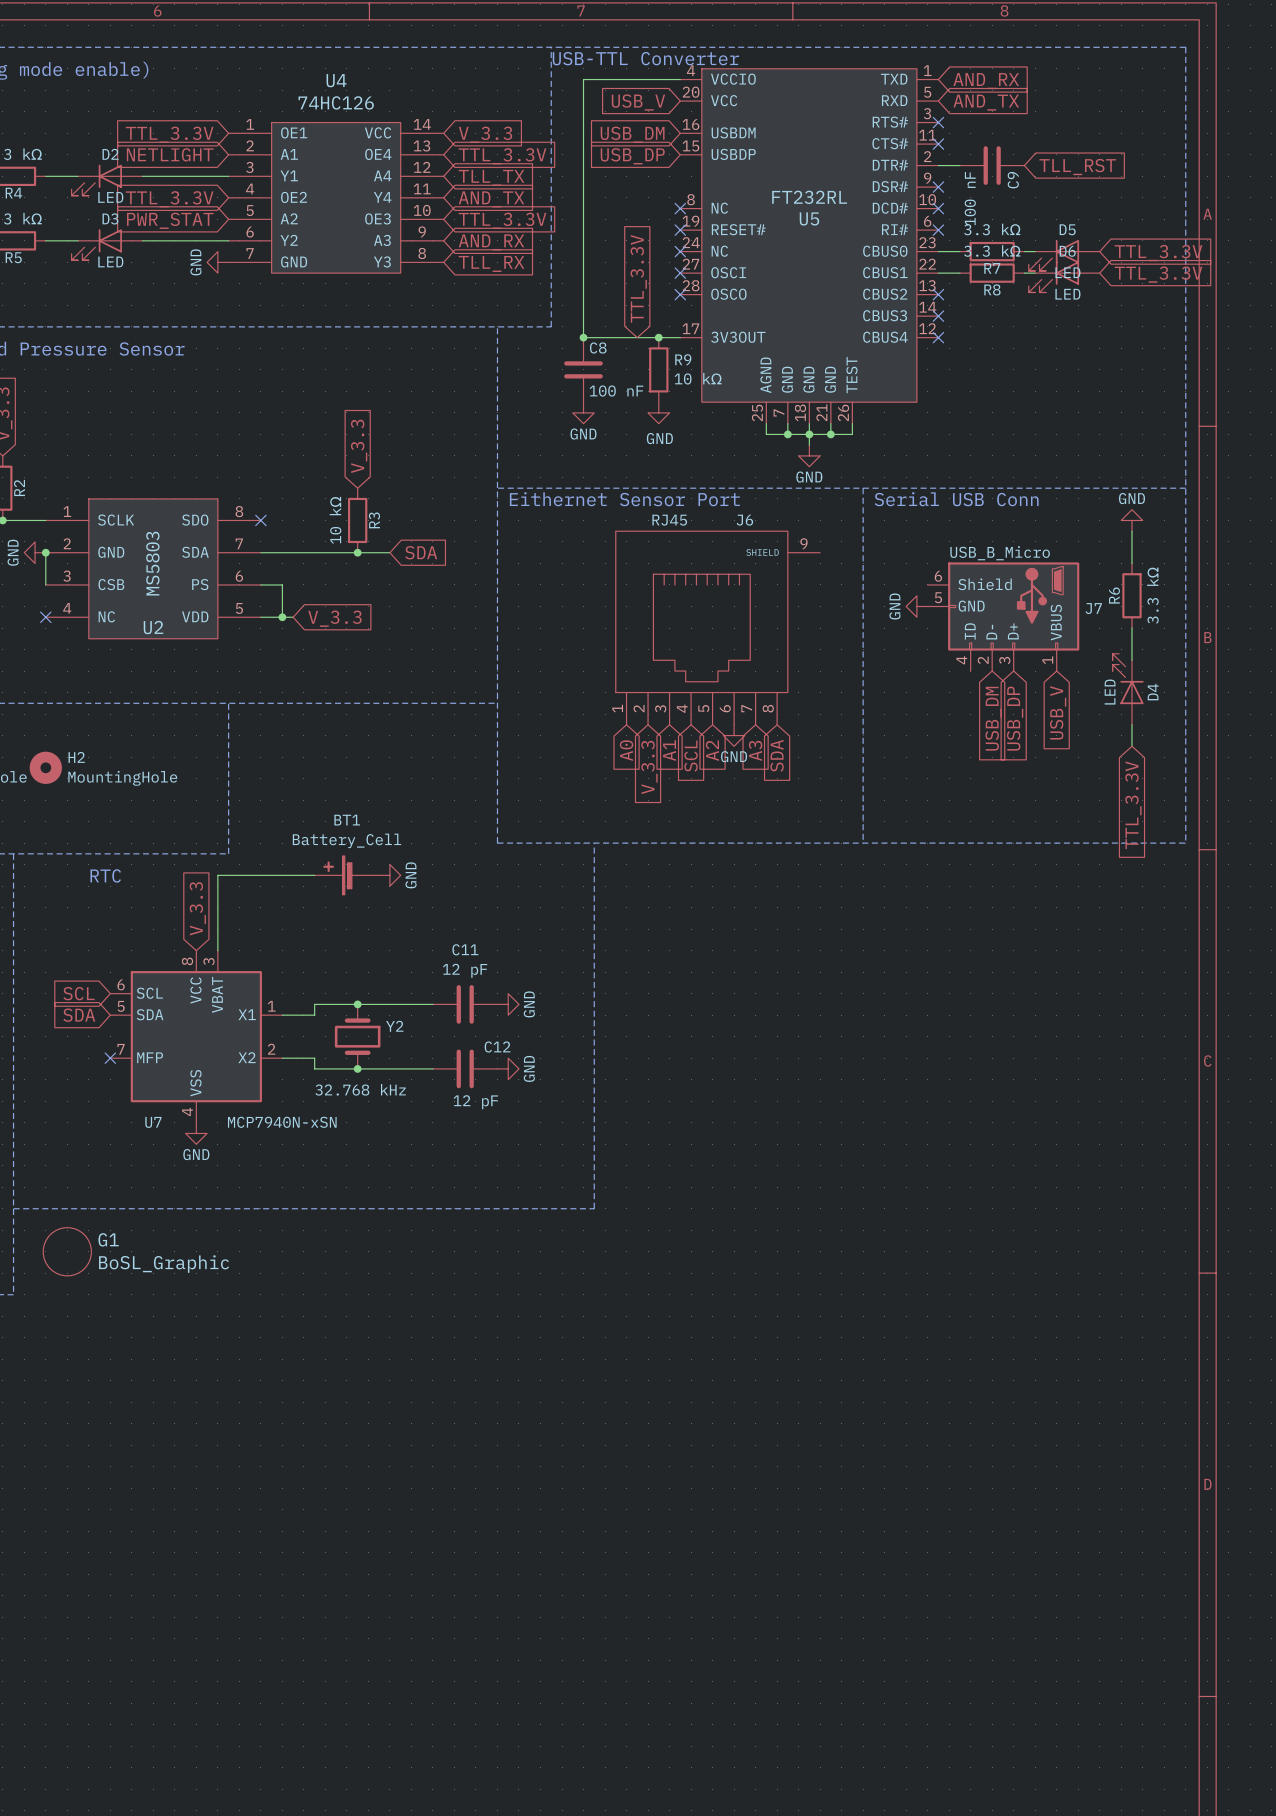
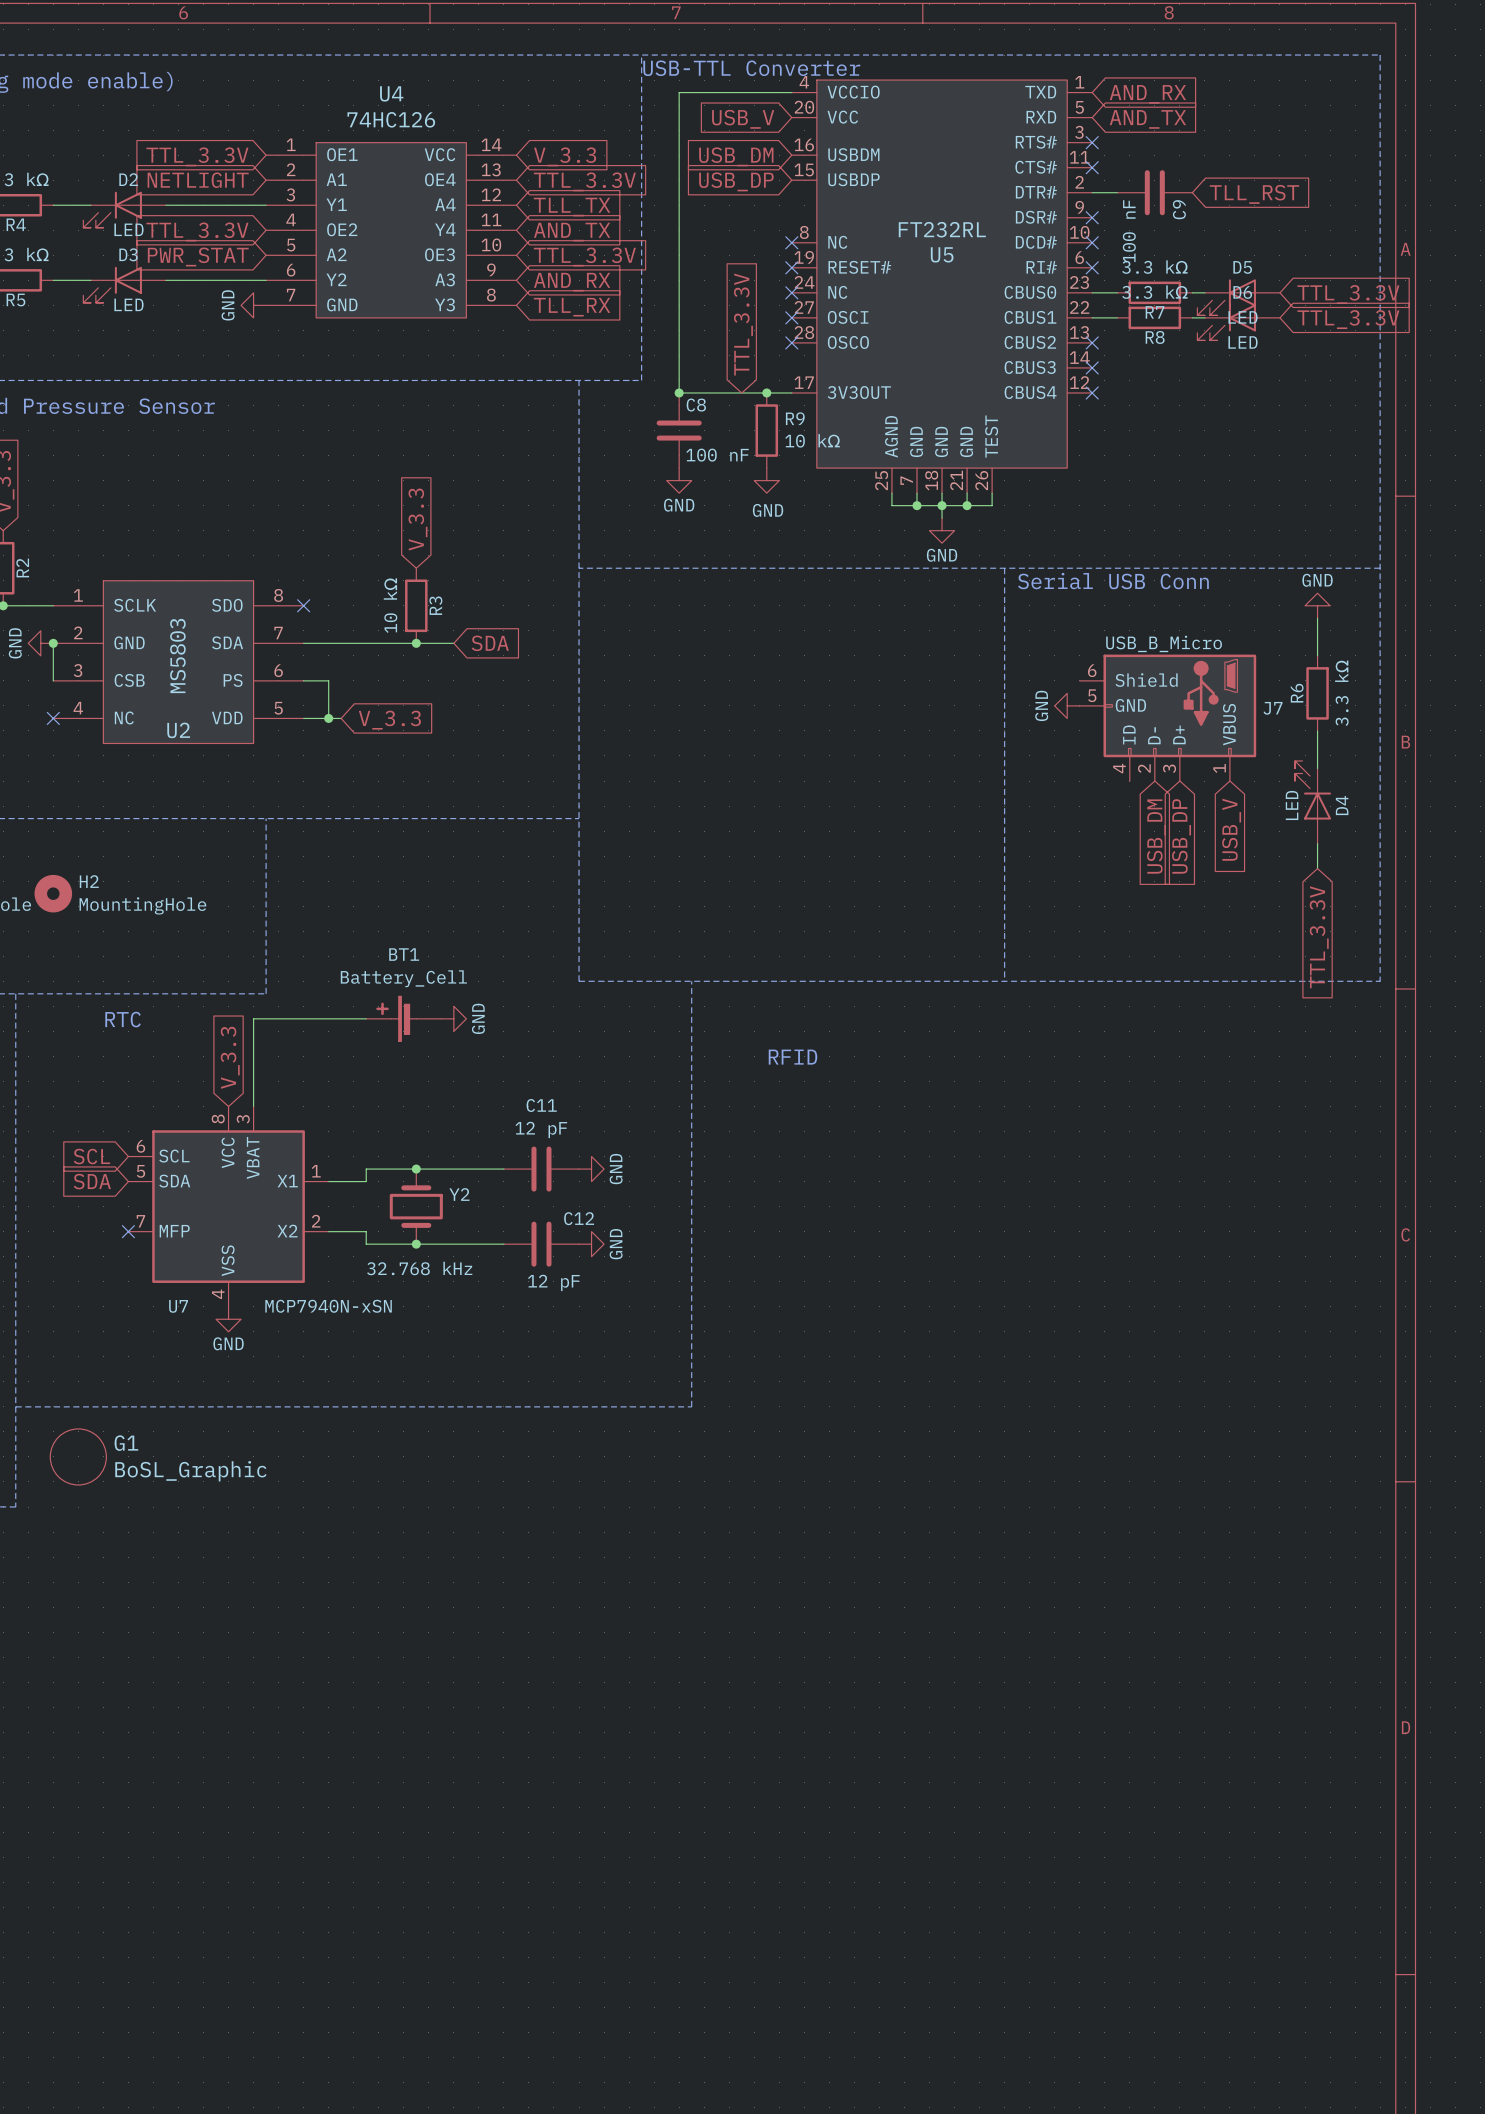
text: Eithernet Sensor Port (624, 499) -> none
J6: RJ45 (717, 628) -> none
power symbol: GND (734, 735) -> none
global label: A0 (626, 750) -> none
global label: A1 (669, 750) -> none
global label: A2 (712, 750) -> none
global label: A3 (755, 750) -> none
global label: SDA (777, 755) -> none
global label: SCL (691, 756) -> none
global label: V_3.3 (649, 767) -> none
text: none -> RFID (792, 1057)

